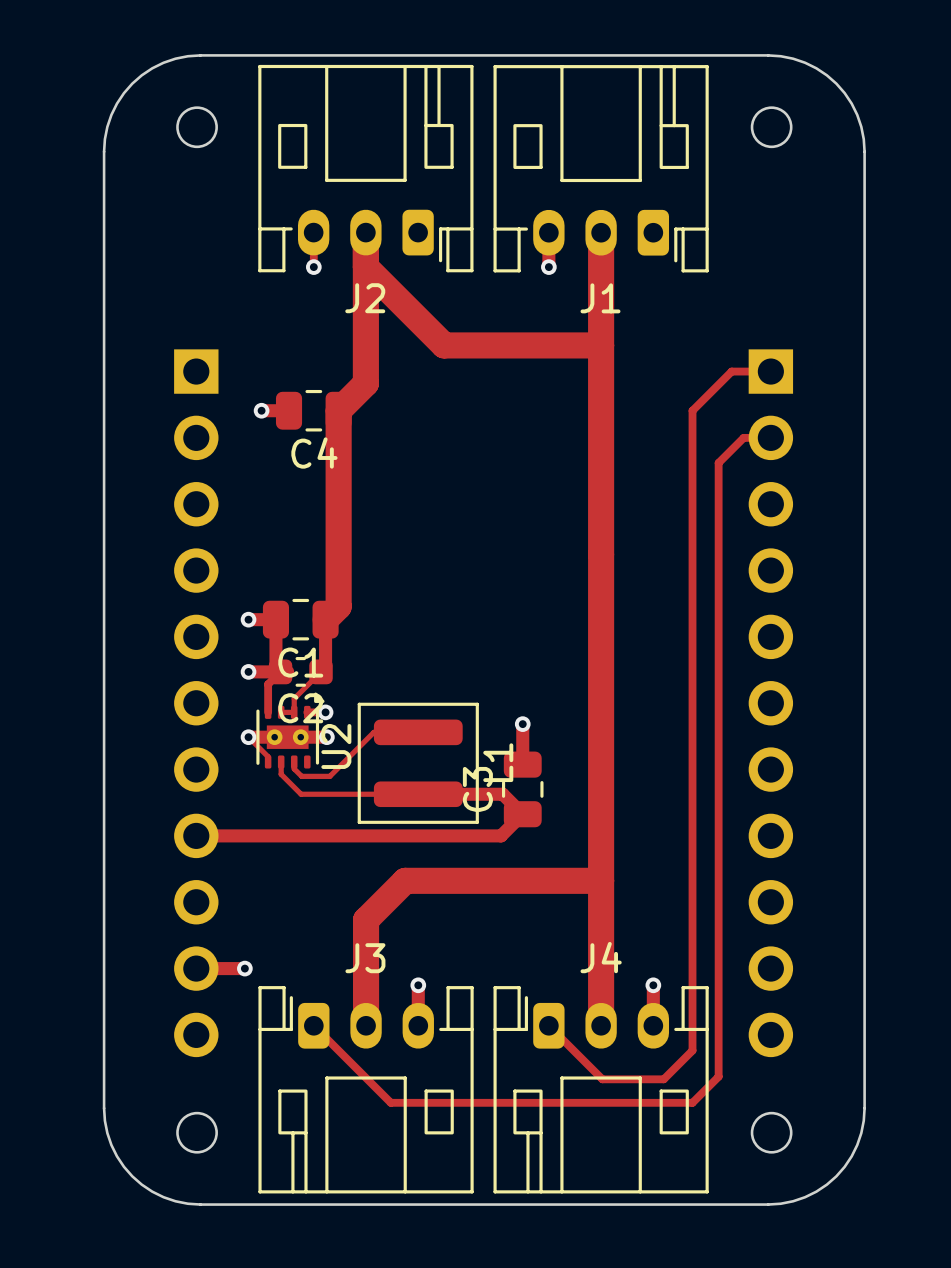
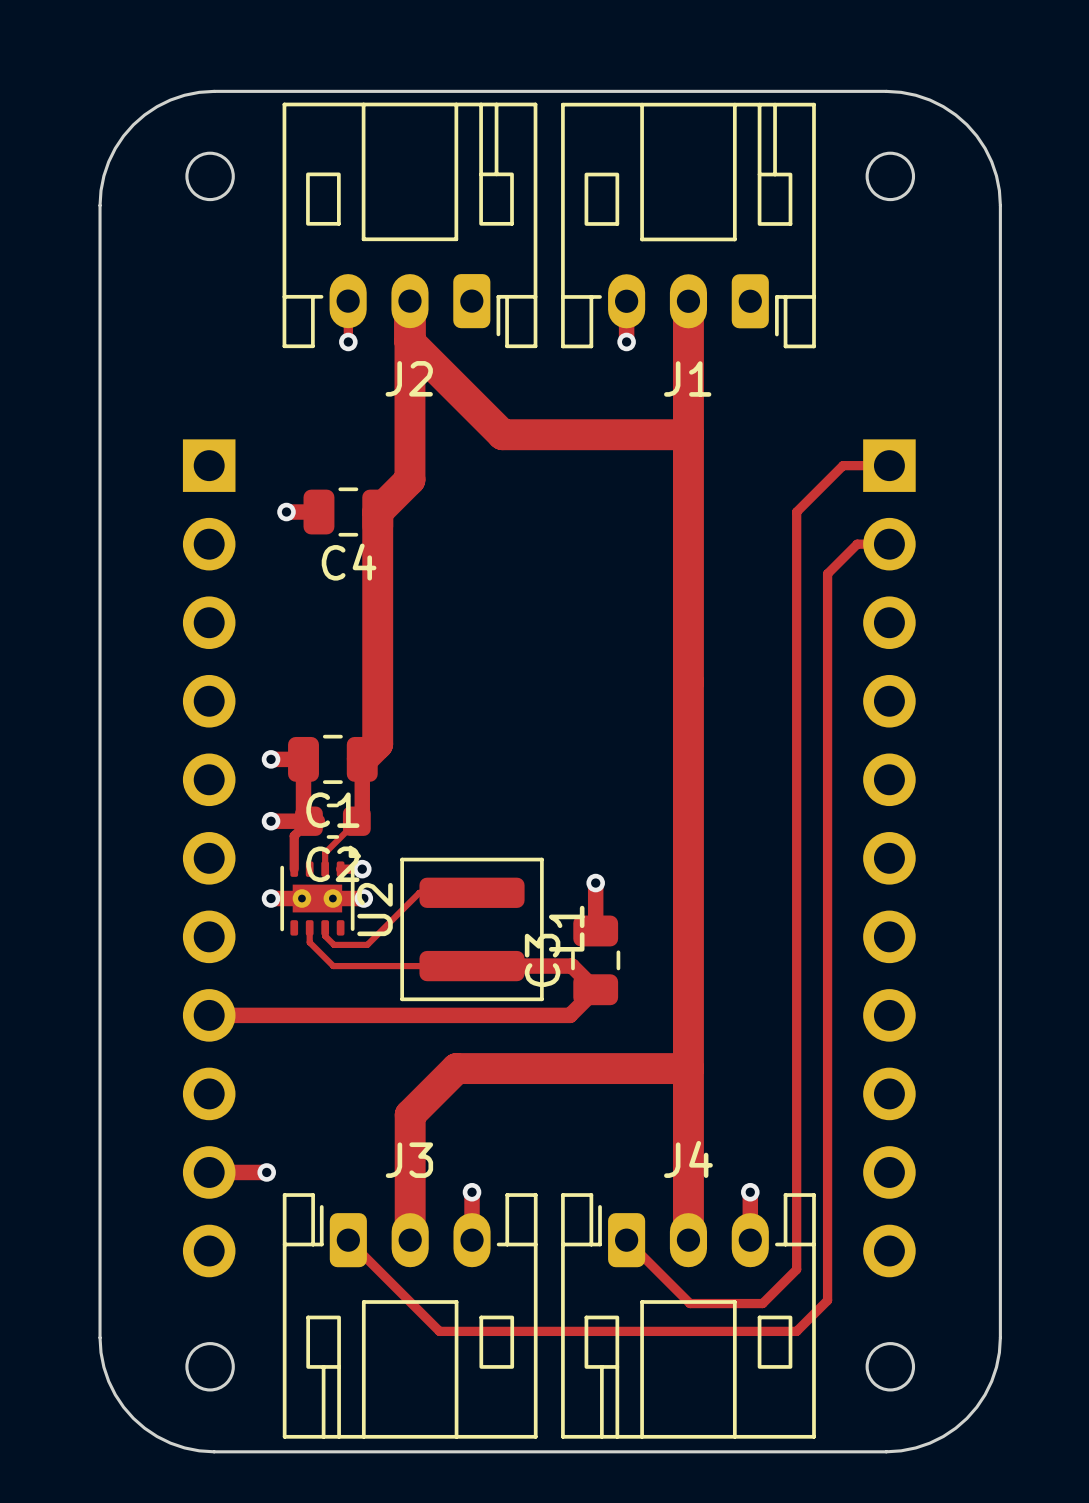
track: (281, 712) (294, 712) -> none
track: (248, 737) (268, 756) (268, 762) -> none

